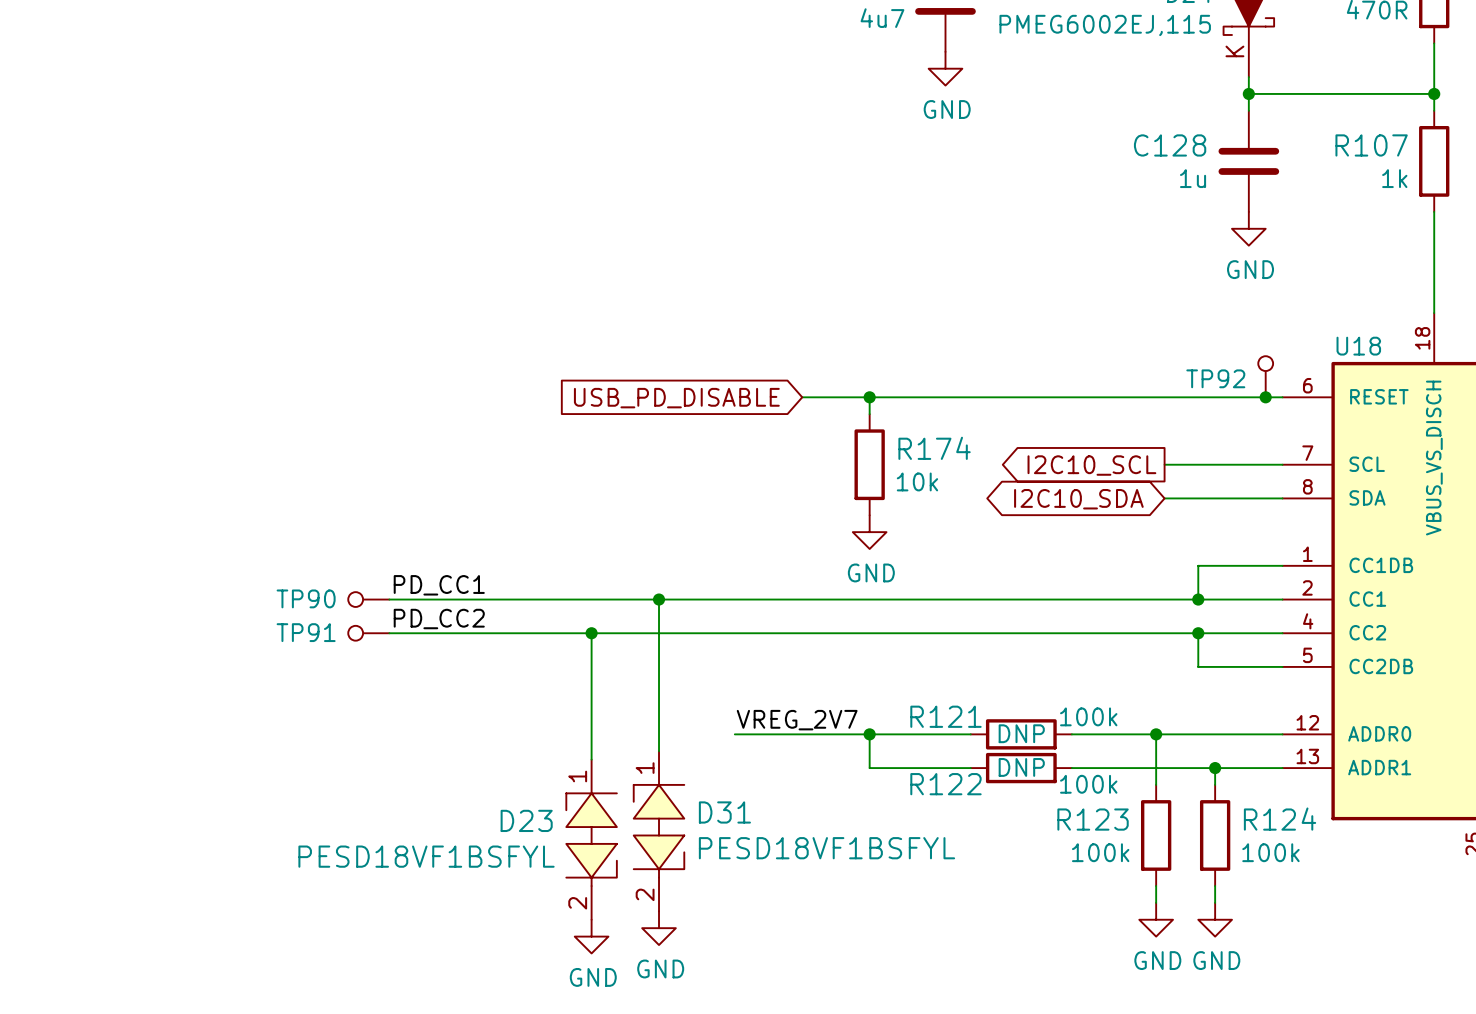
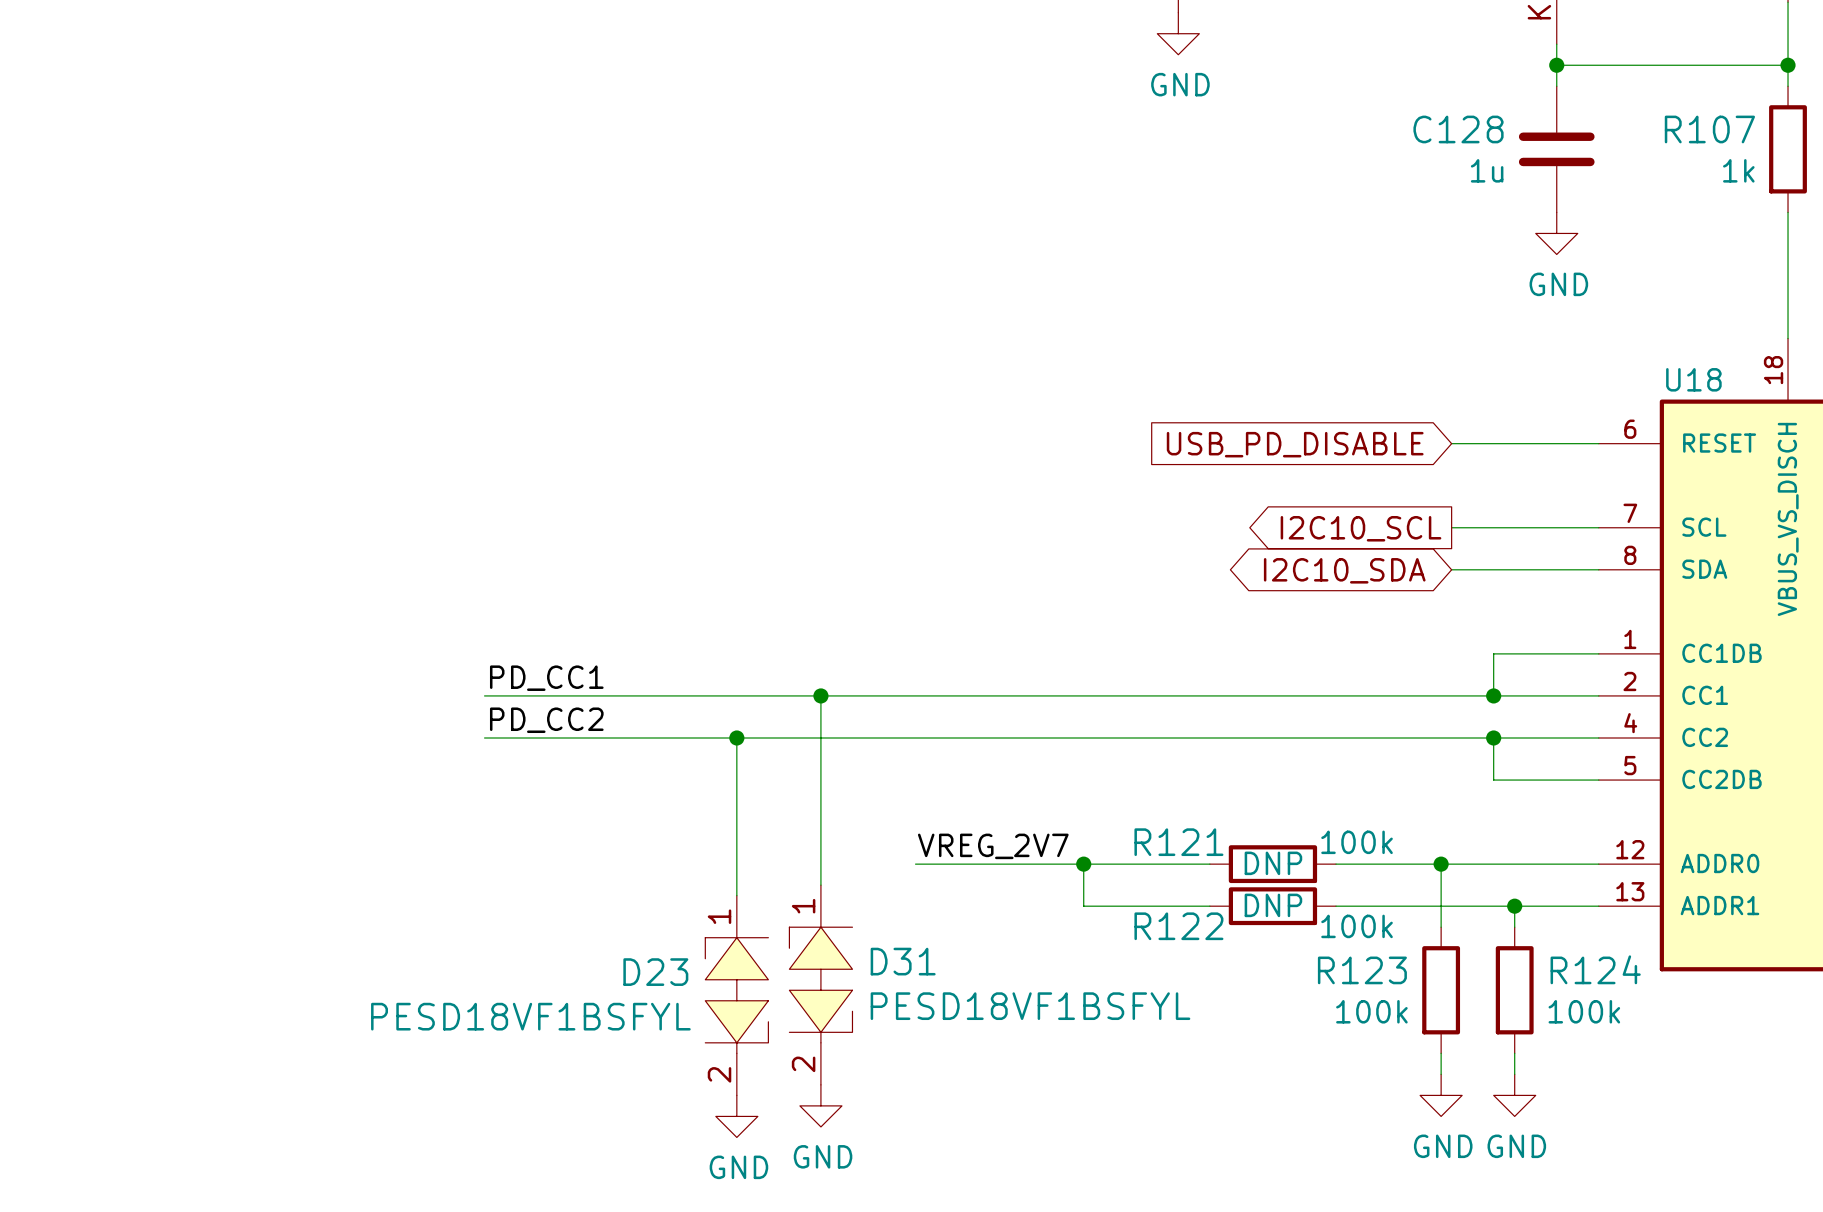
TP92: (1265, 376) -> none
wire: (802, 397) (1164, 397) -> none
wire: (869, 397) (869, 414) -> none
junction: (869, 397) -> none
junction: (1265, 397) -> none
global label: USB_PD_DISABLE (676, 398) -> none
global label: none -> USB_PD_DISABLE (1295, 444)
R174: (869, 464) -> none
power symbol: GND (869, 532) -> none
TP90: (368, 599) -> none
TP91: (368, 633) -> none

